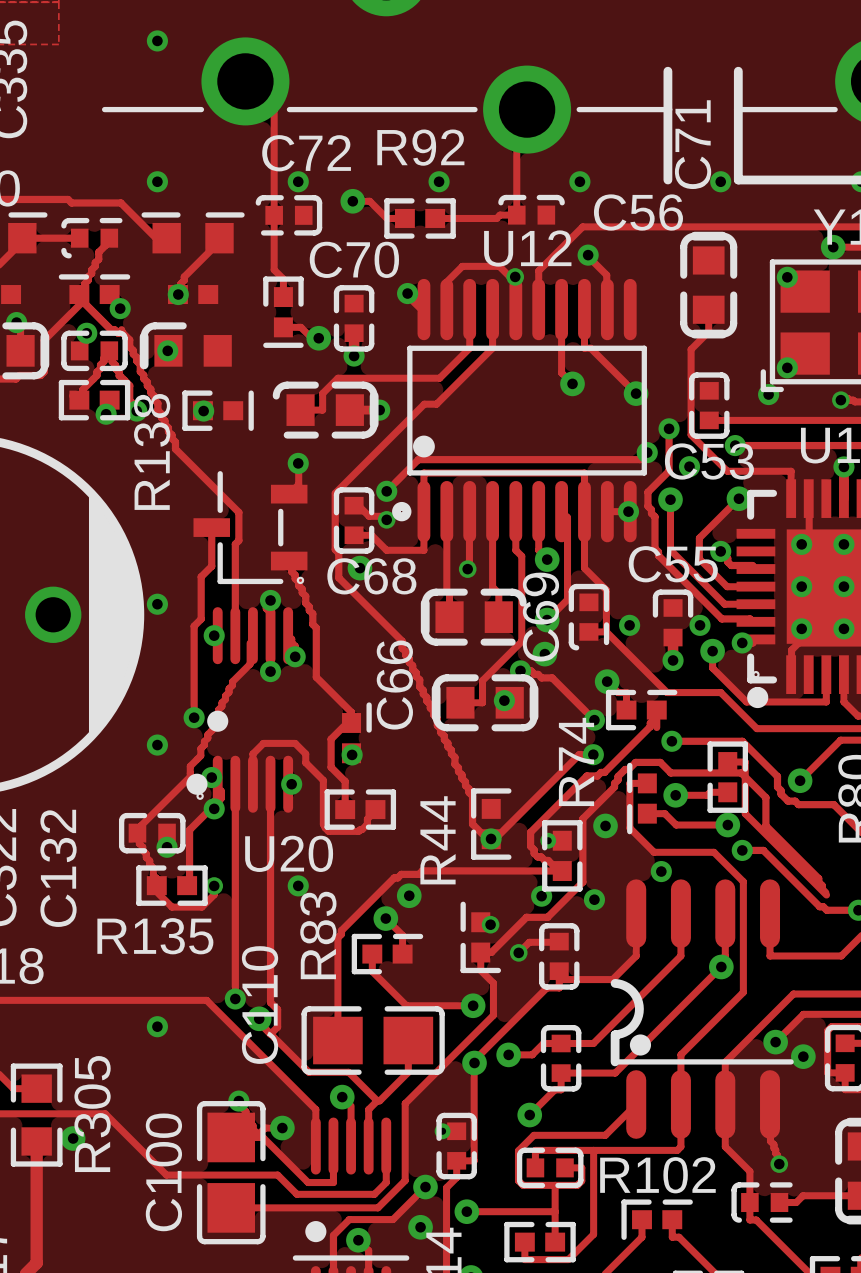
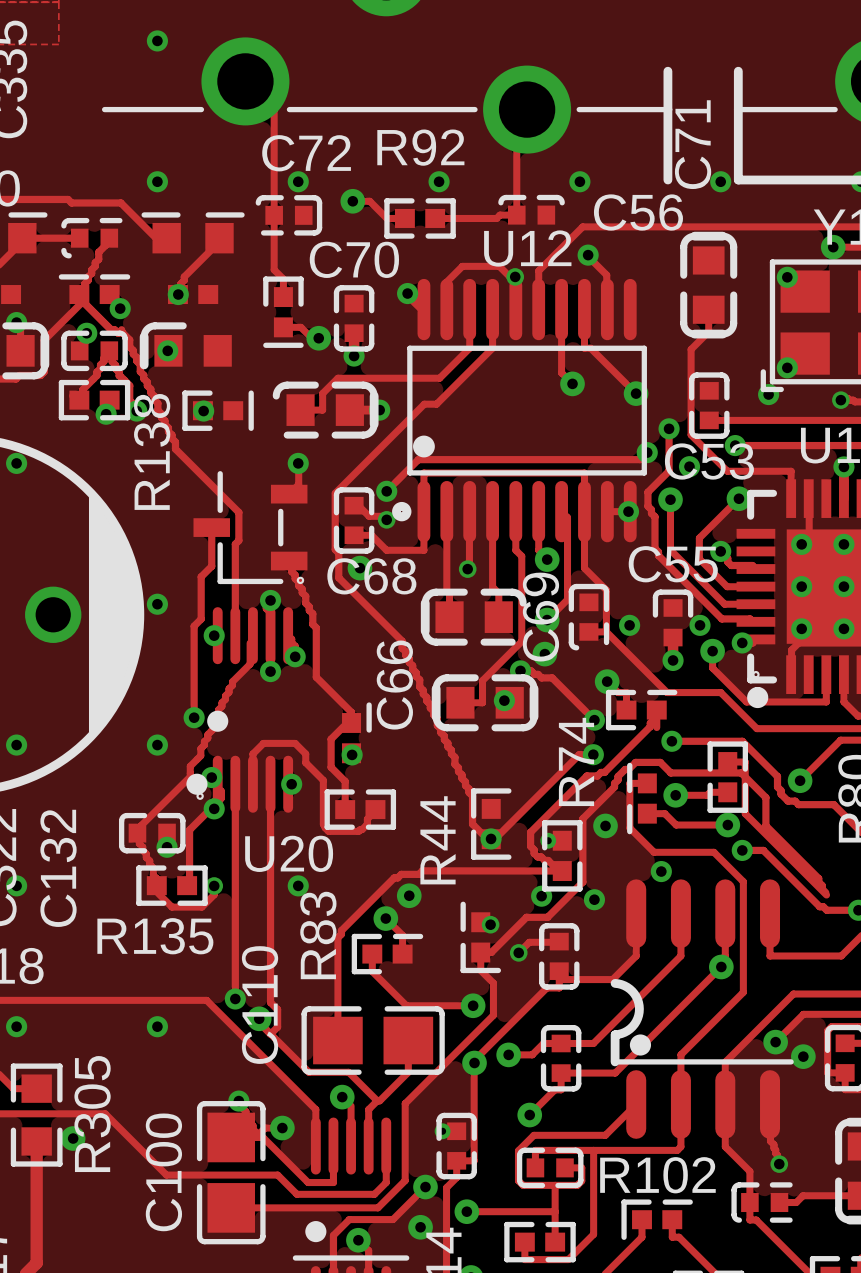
via: none -> (16, 463)
via: none -> (16, 745)
via: none -> (16, 885)
via: none -> (16, 1026)

